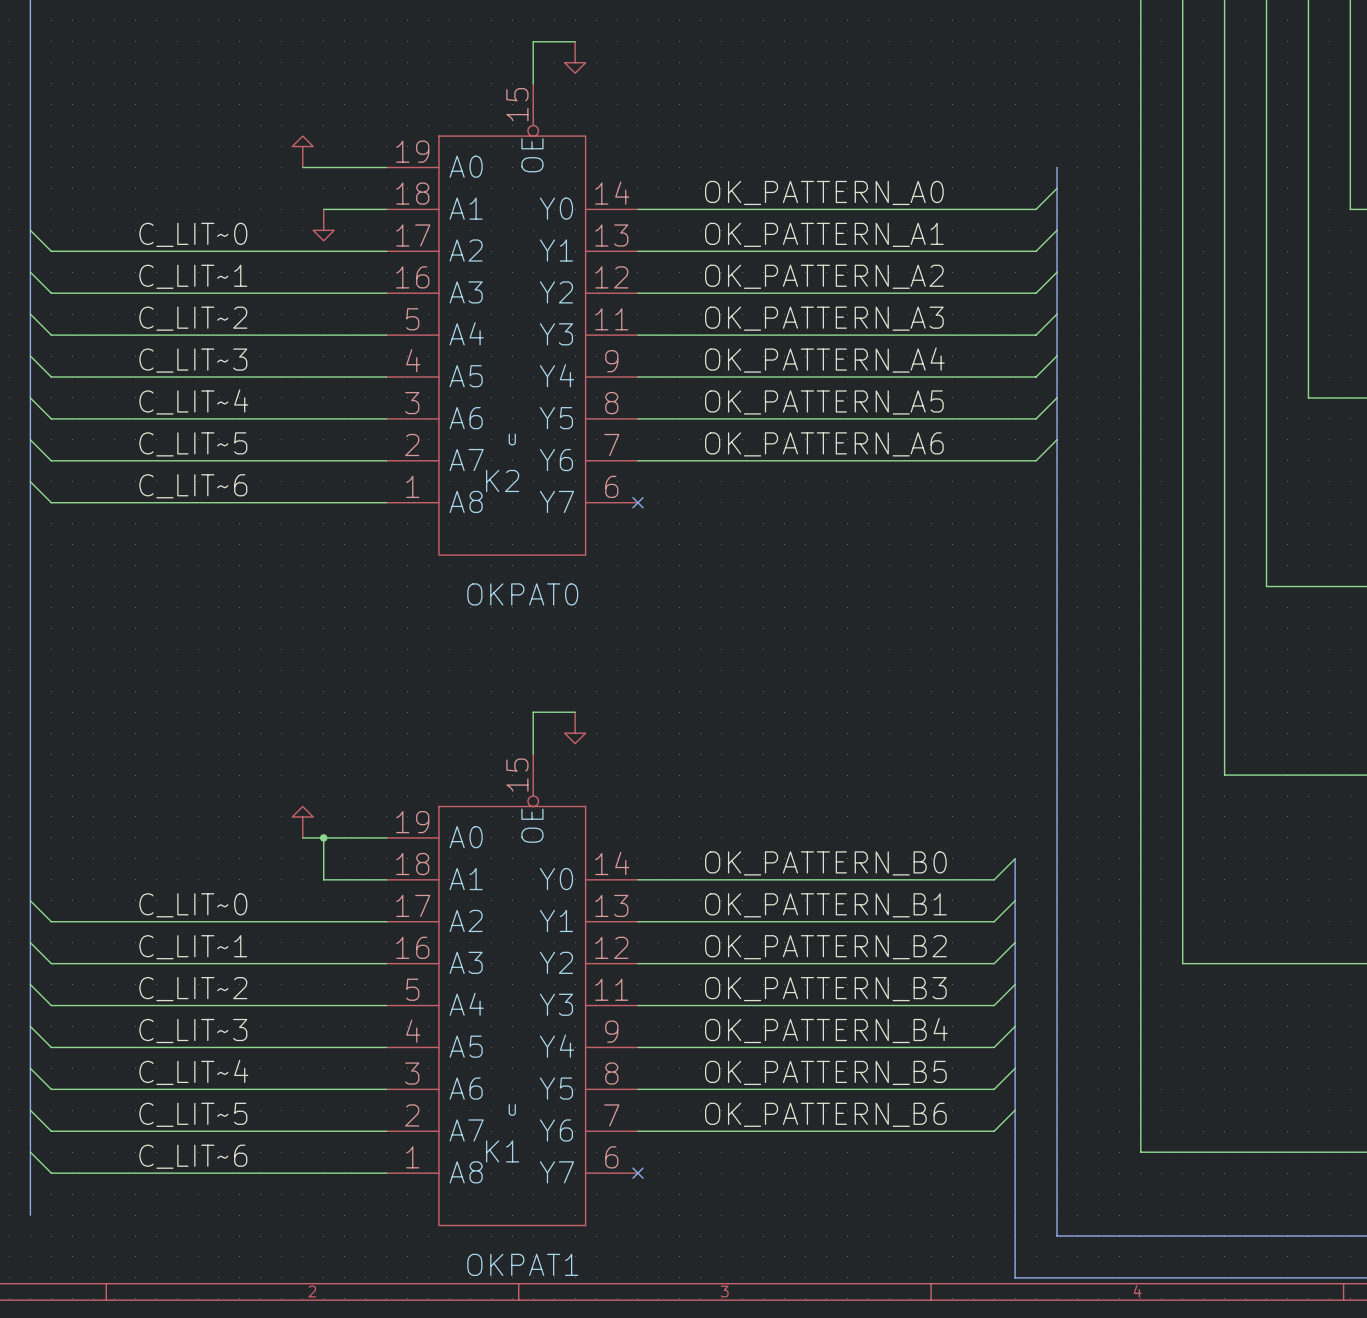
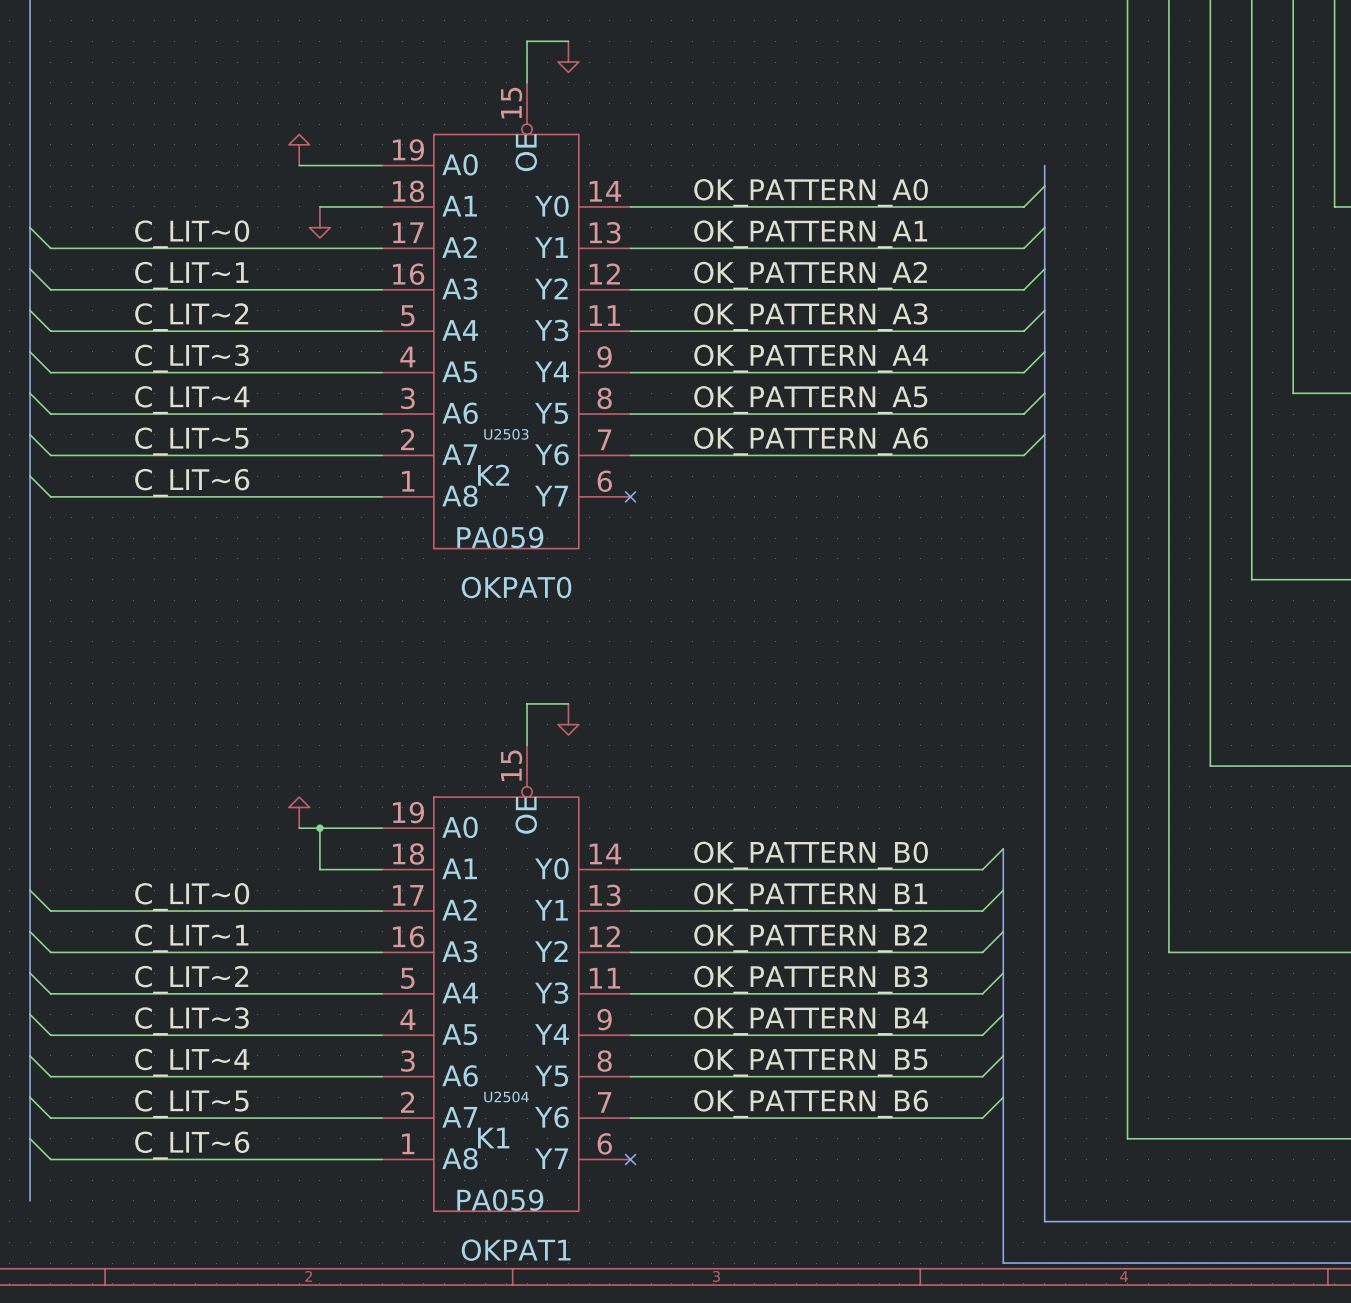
U name: U (512, 439) -> U2503 (506, 434)
U value: none -> PA059 (500, 537)
U name: U (512, 1109) -> U2504 (506, 1096)
U value: none -> PA059 (500, 1200)

